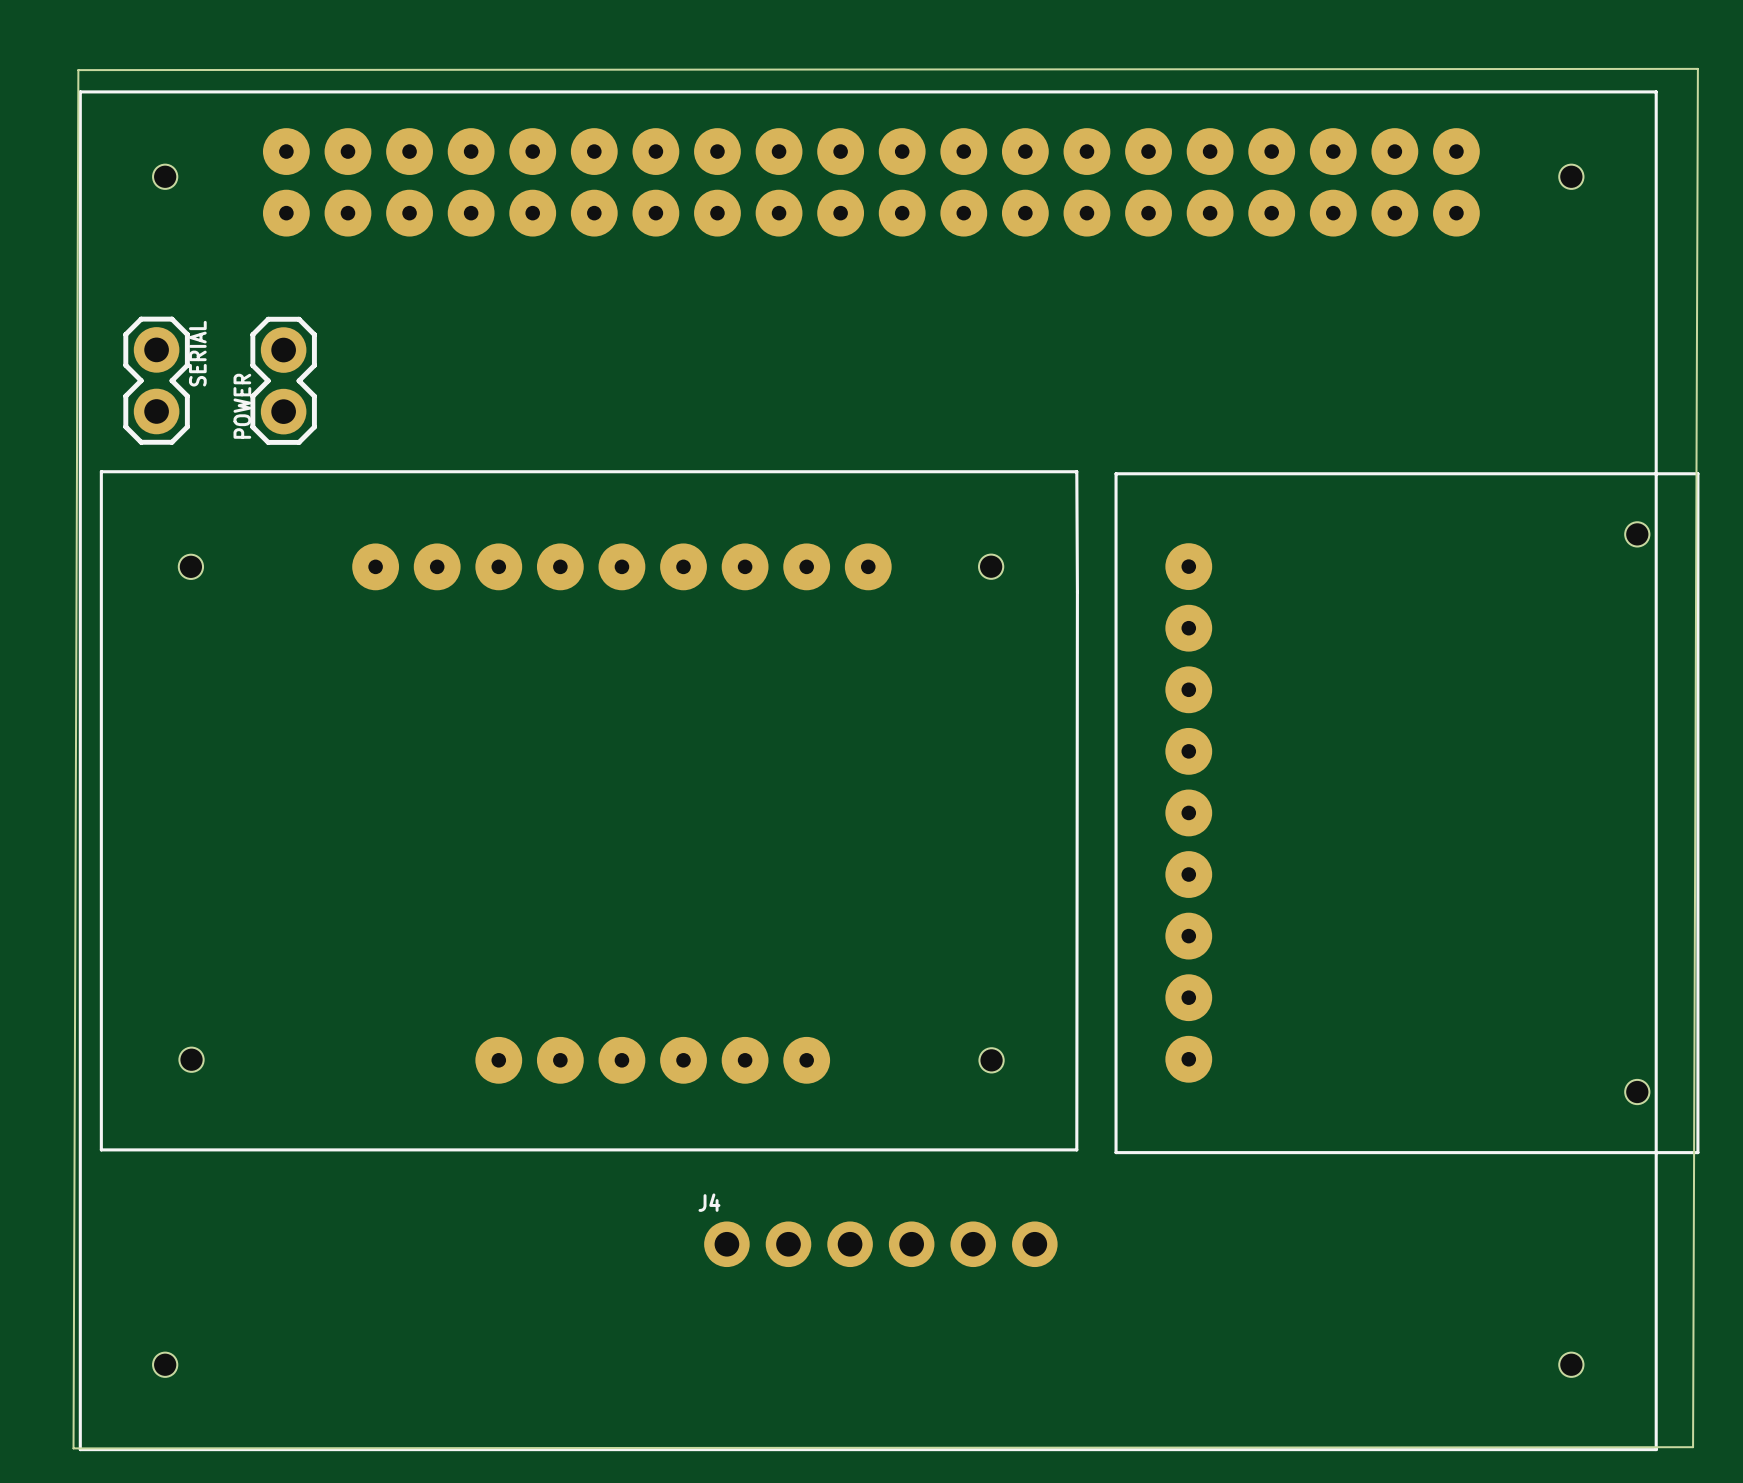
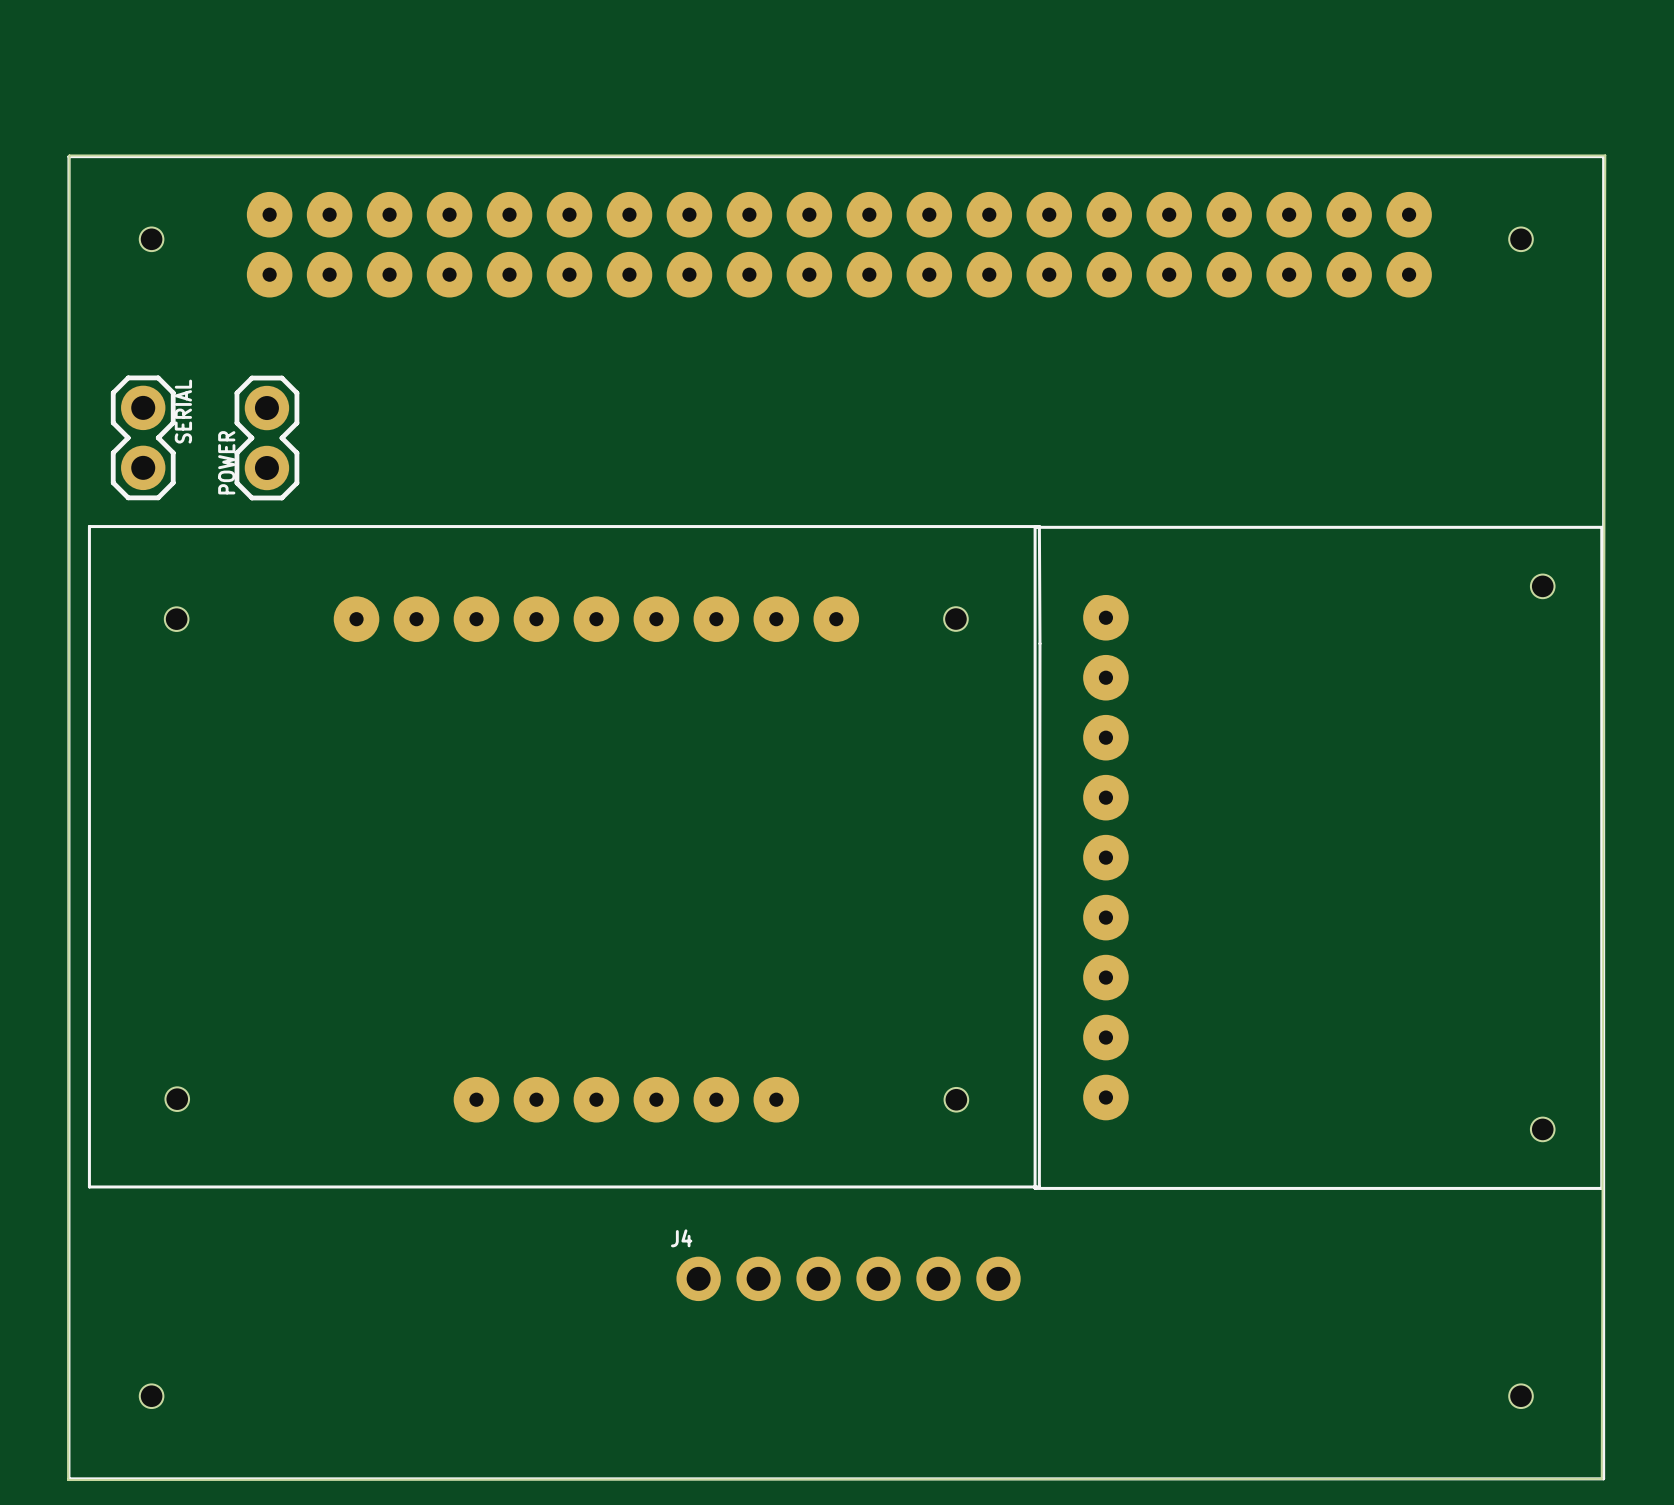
board edge: (1697, 68) (1693, 1447) (73, 1448) (78, 70) (1697, 68) -> (69, 155) (68, 1480) (1601, 1478) (1605, 155) (69, 155)
part position: (1406, 813) -> (1318, 857)

